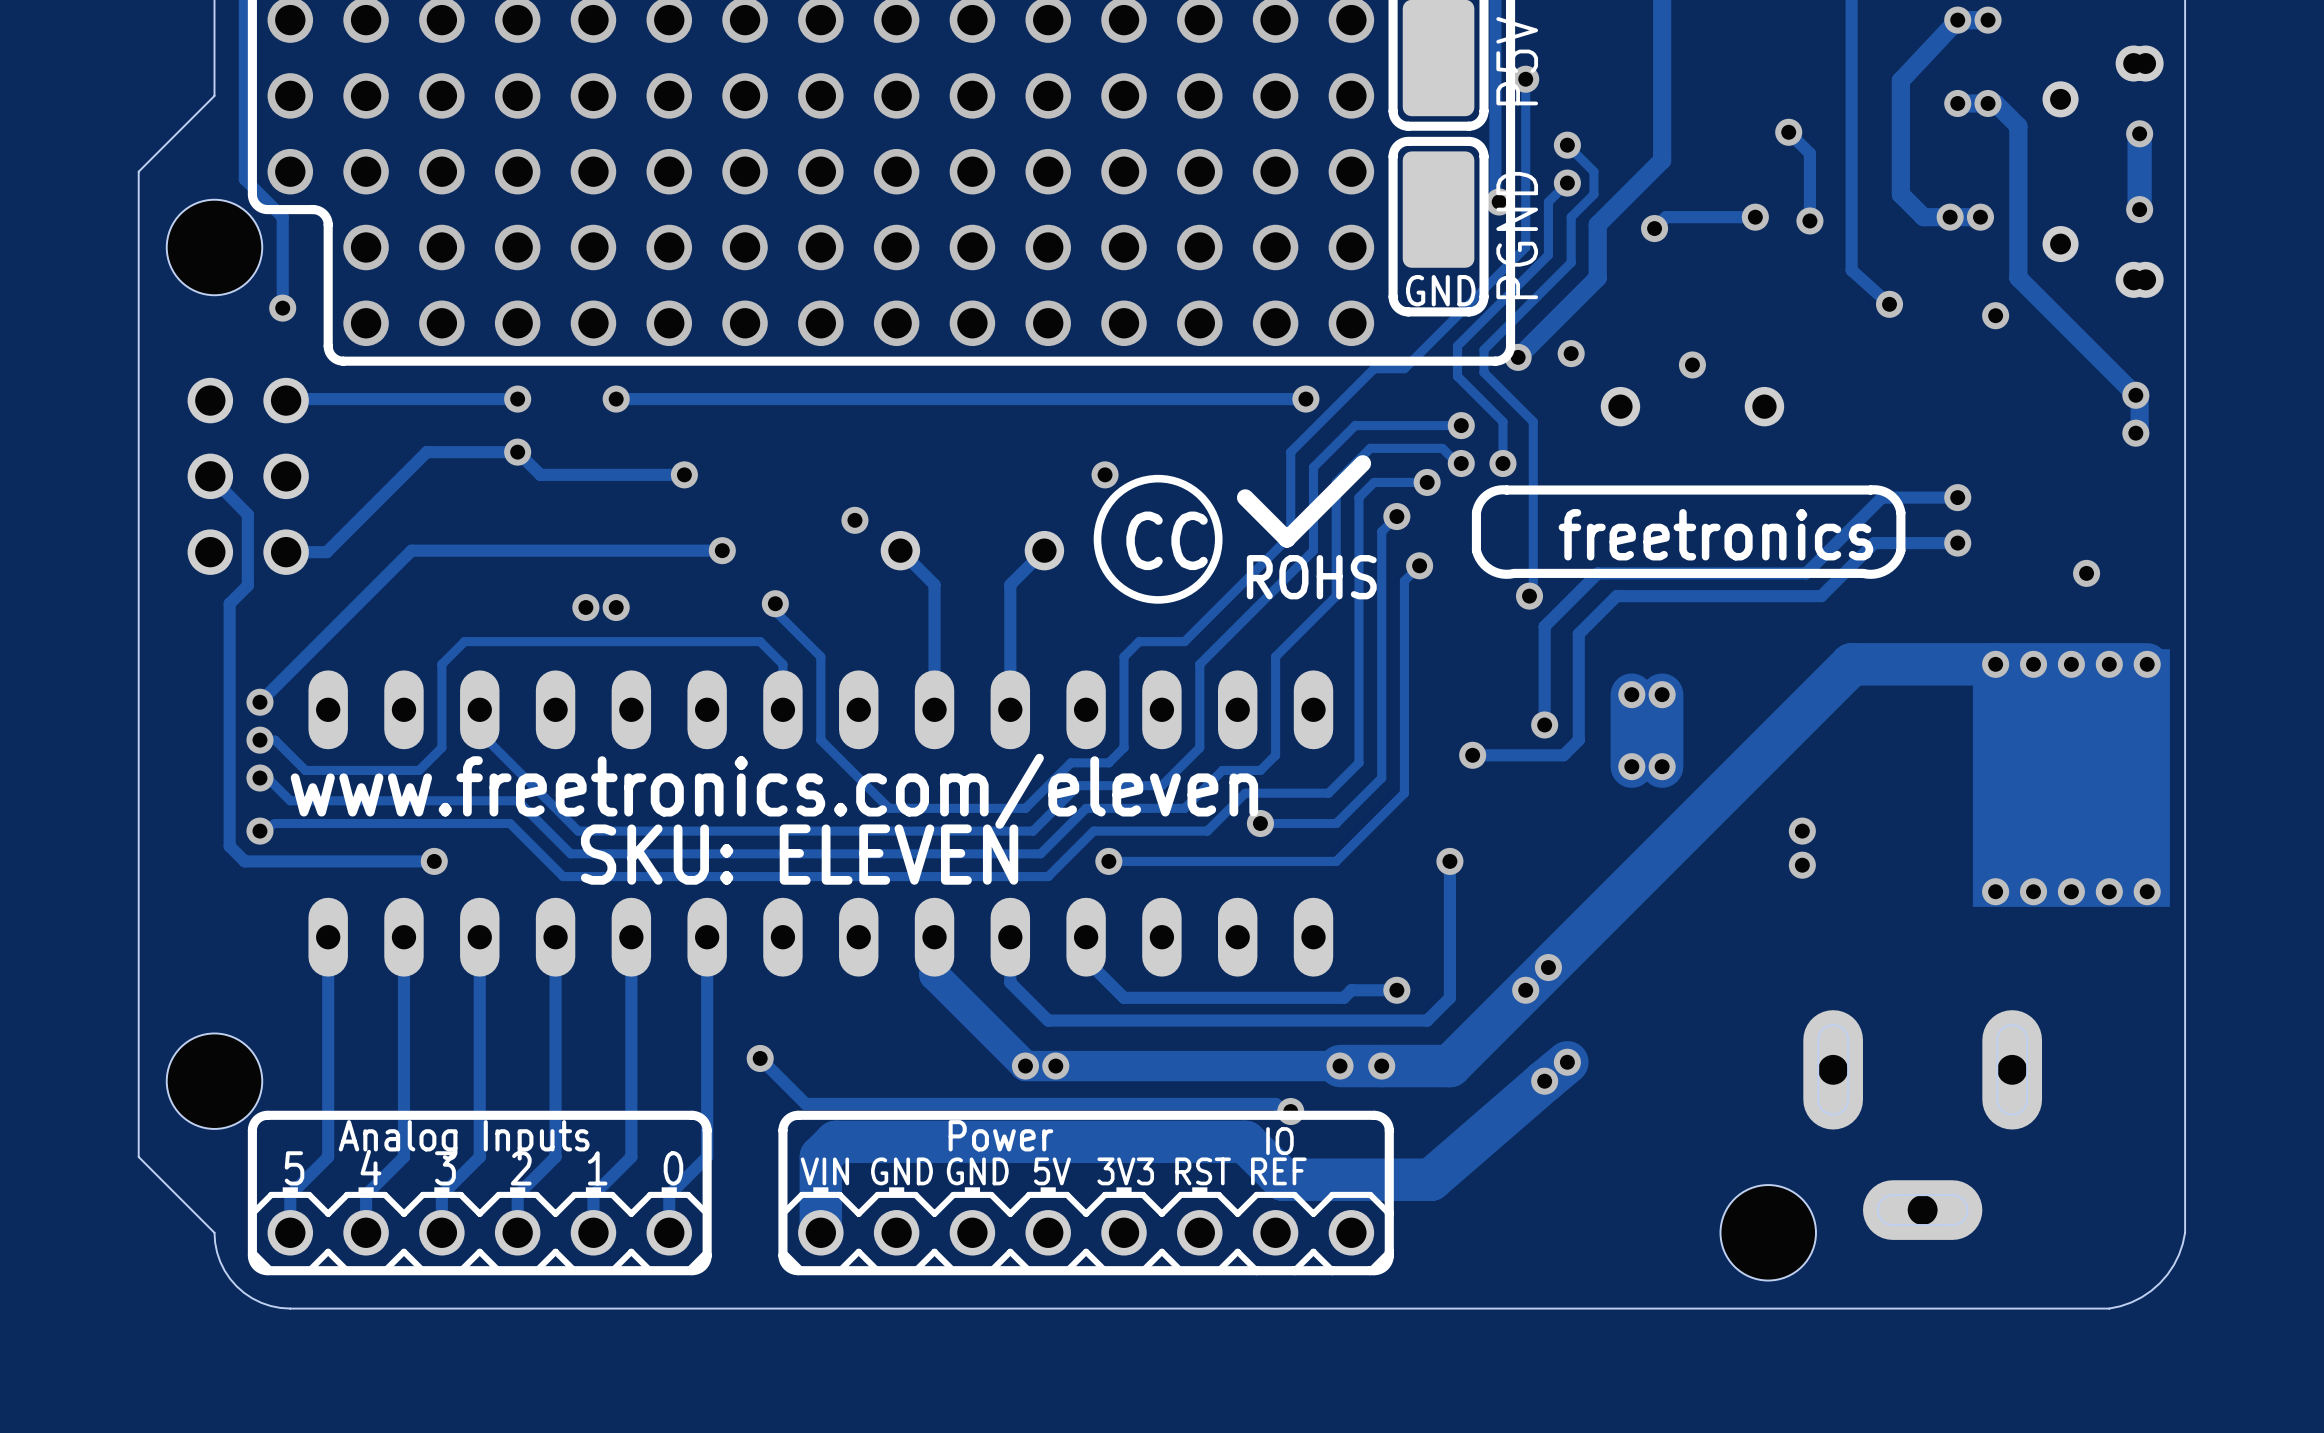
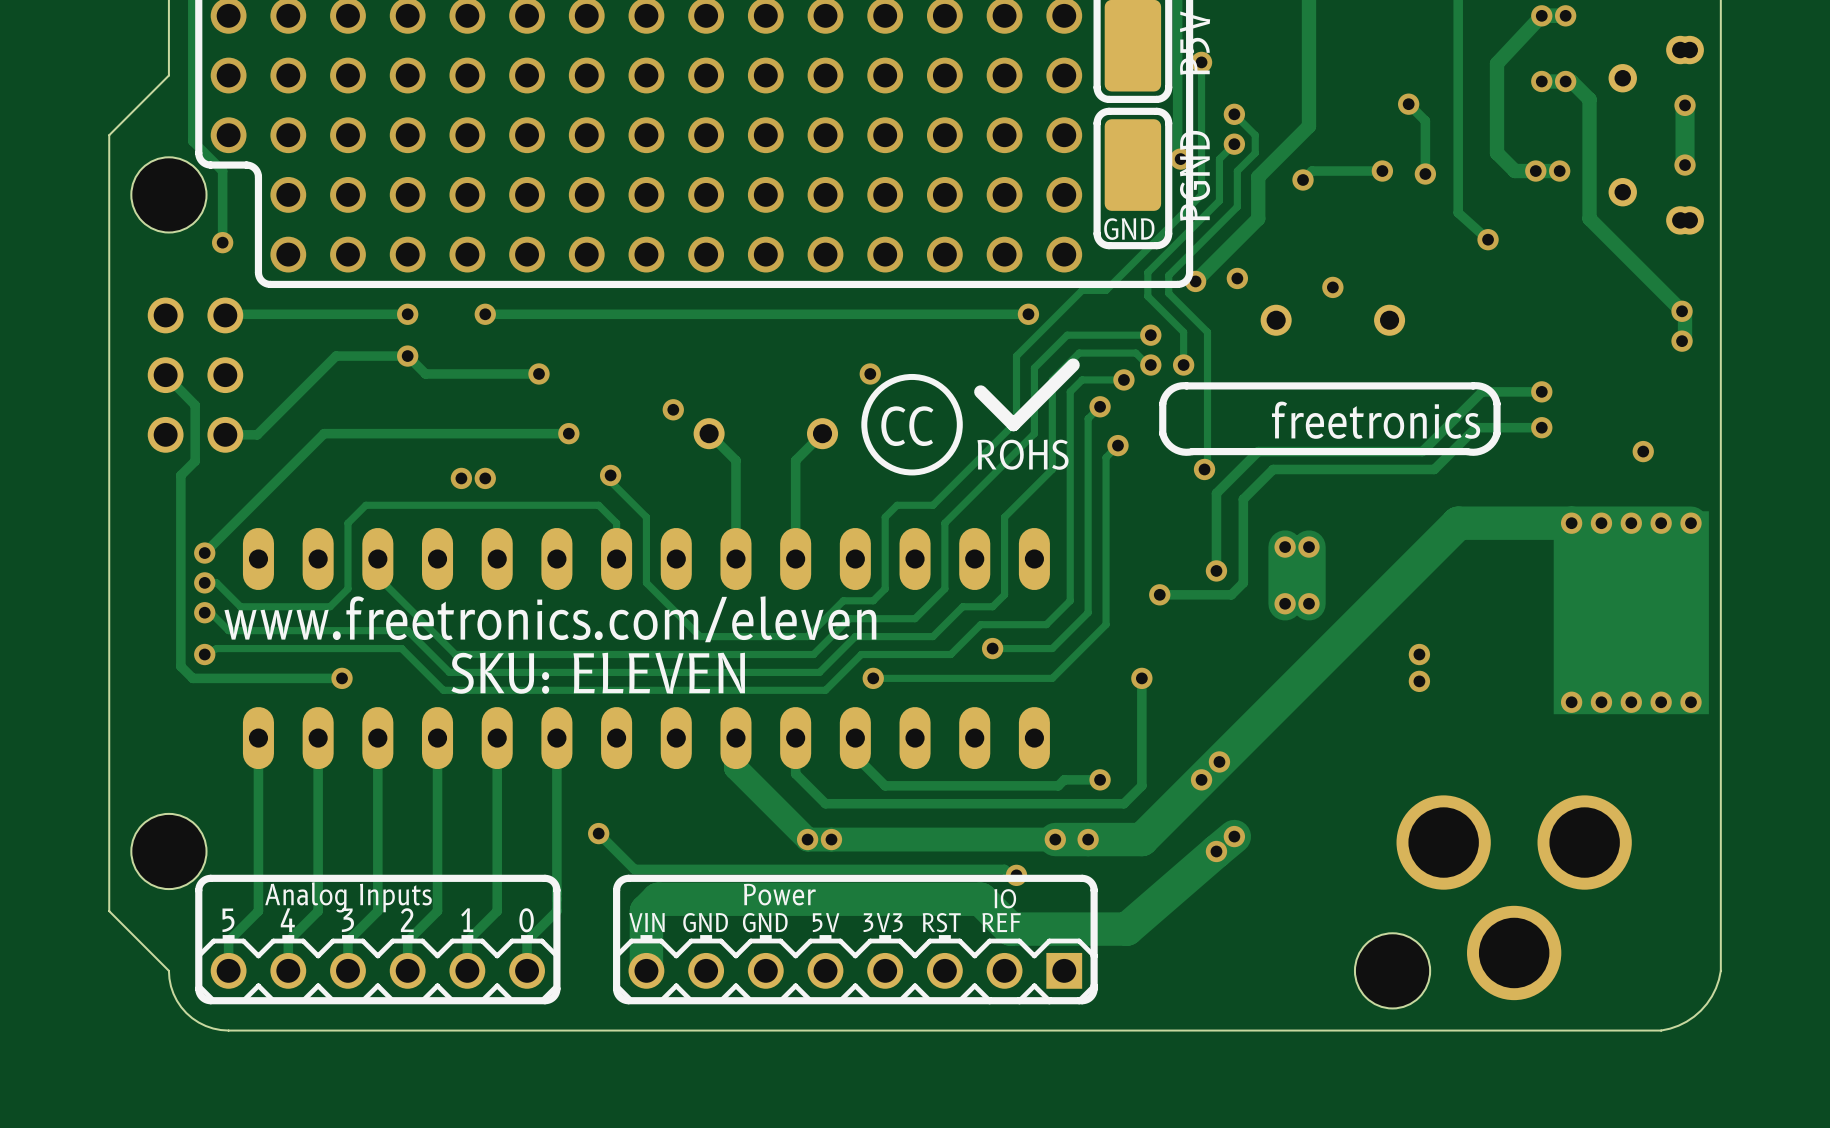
via: (1995, 315) -> none
part footprint: [1803, 1010, 2043, 1240] -> [1396, 795, 1632, 1001]
part footprint: [798, 1210, 1375, 1256] -> [628, 952, 1083, 989]

